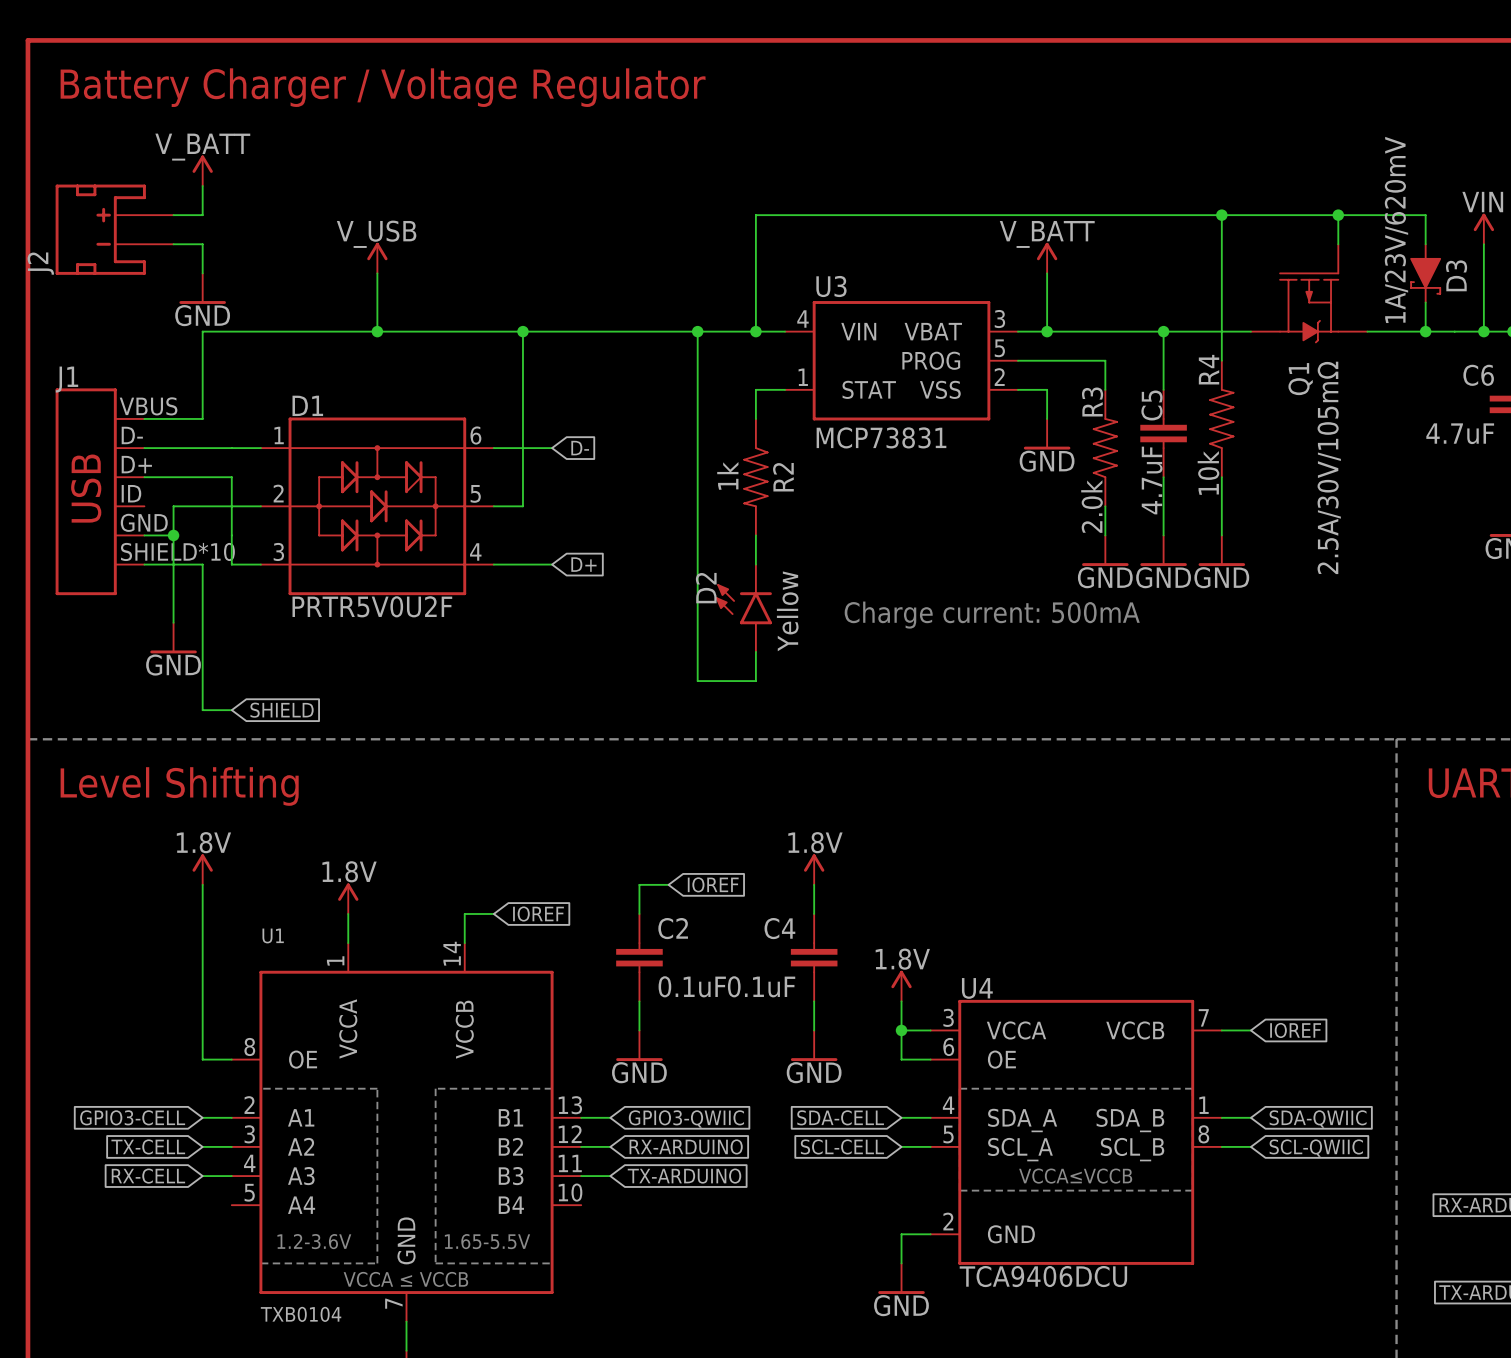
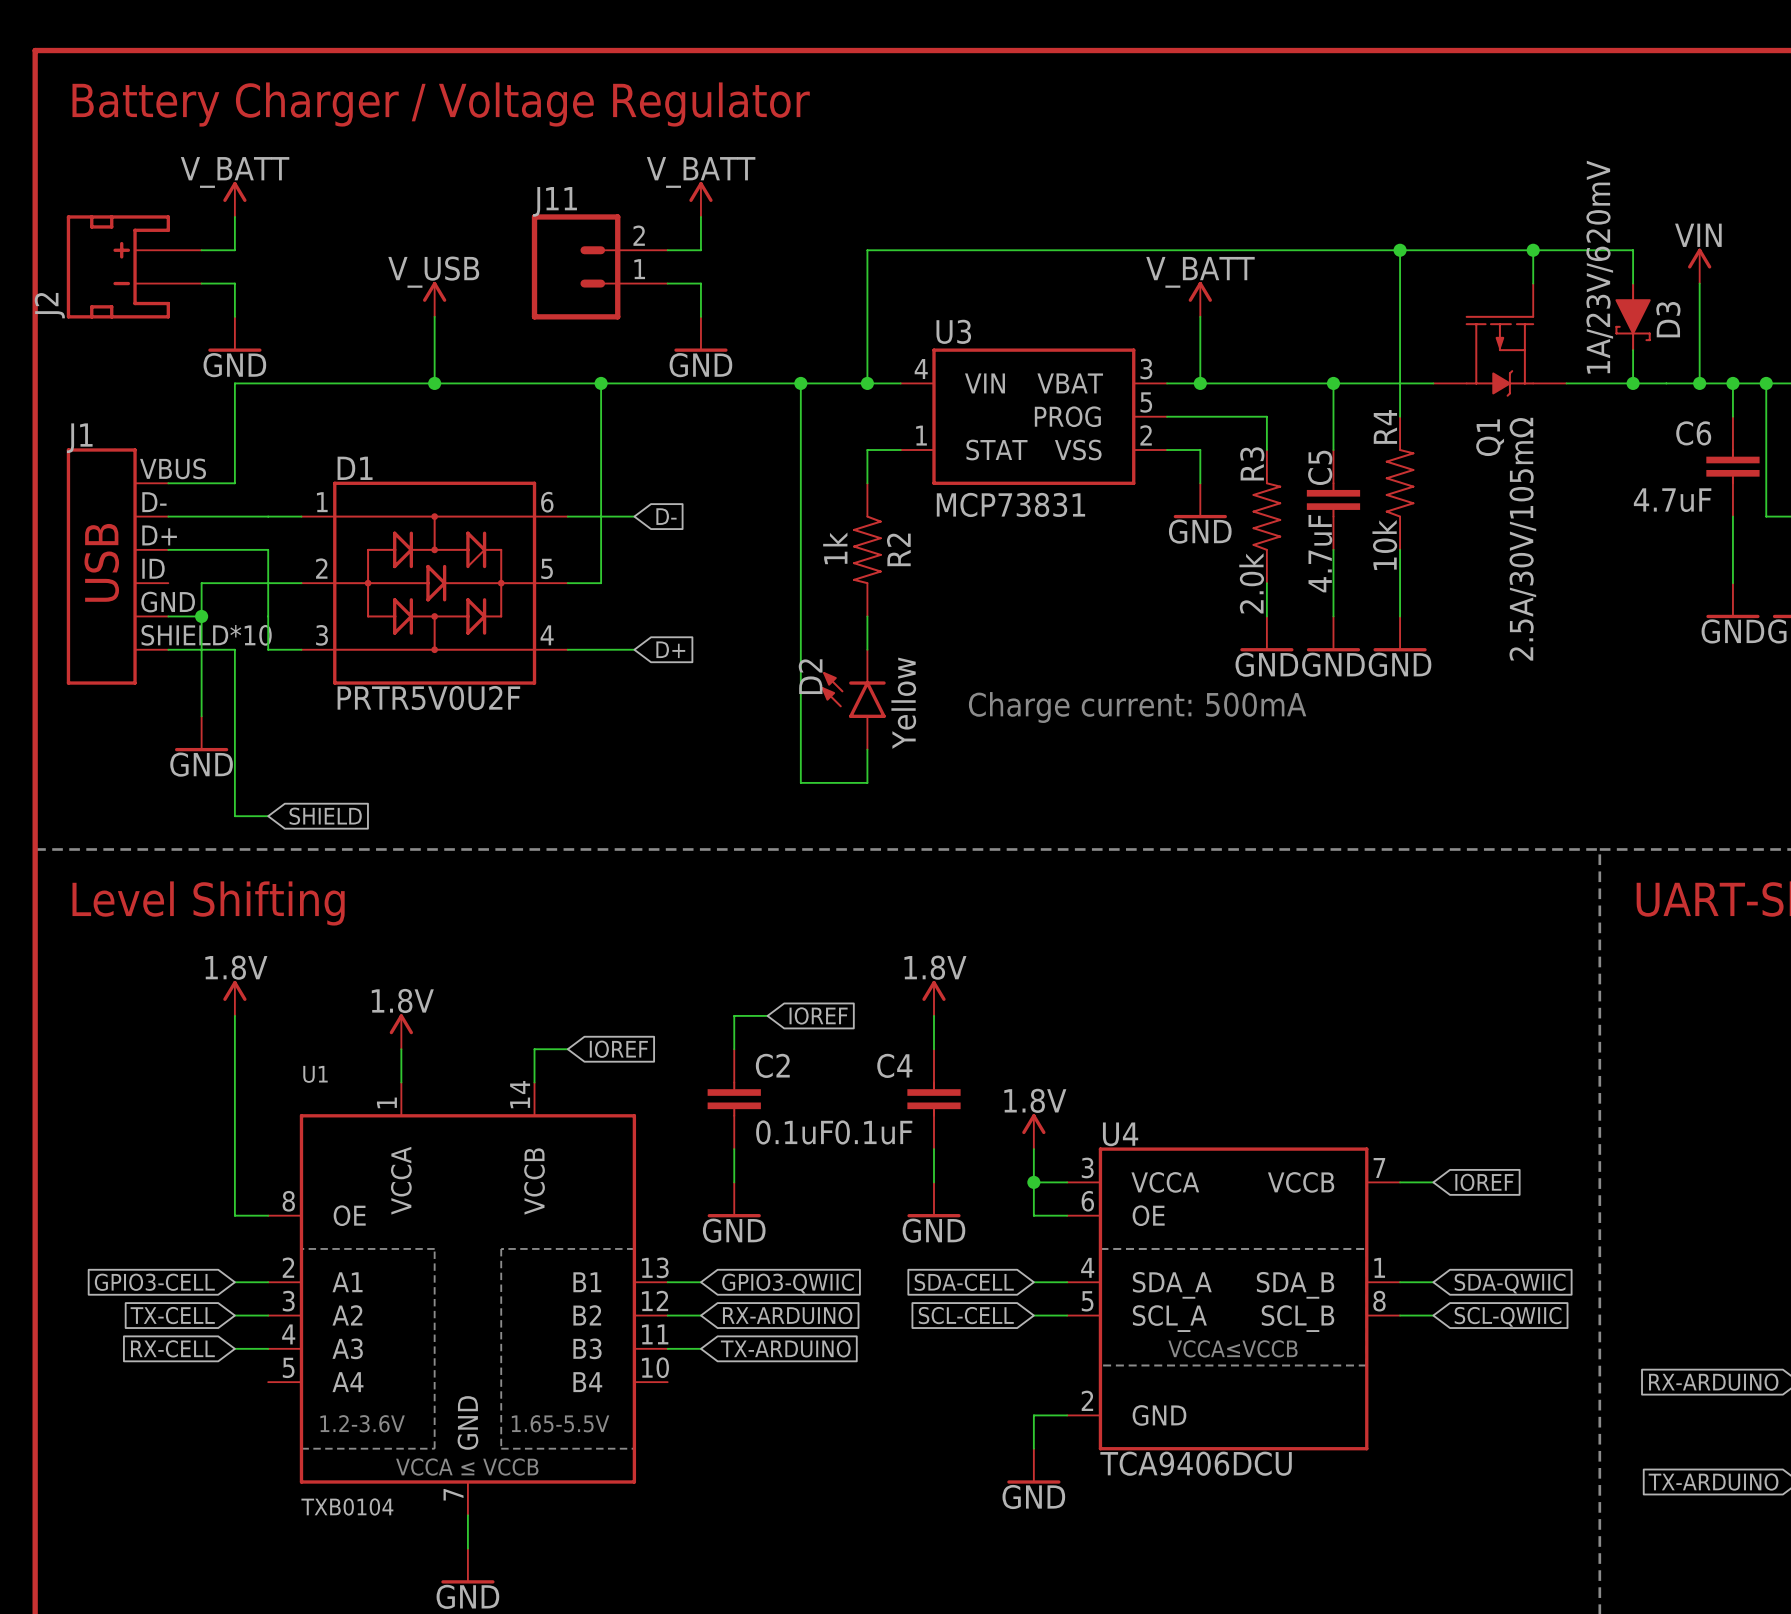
power symbol: none -> V_BATT (700, 199)
wire: none -> (700, 216) (700, 250) (667, 250)
J11: none -> (599, 266)
wire: none -> (667, 283) (700, 283) (700, 316)
power symbol: none -> GND (700, 334)

